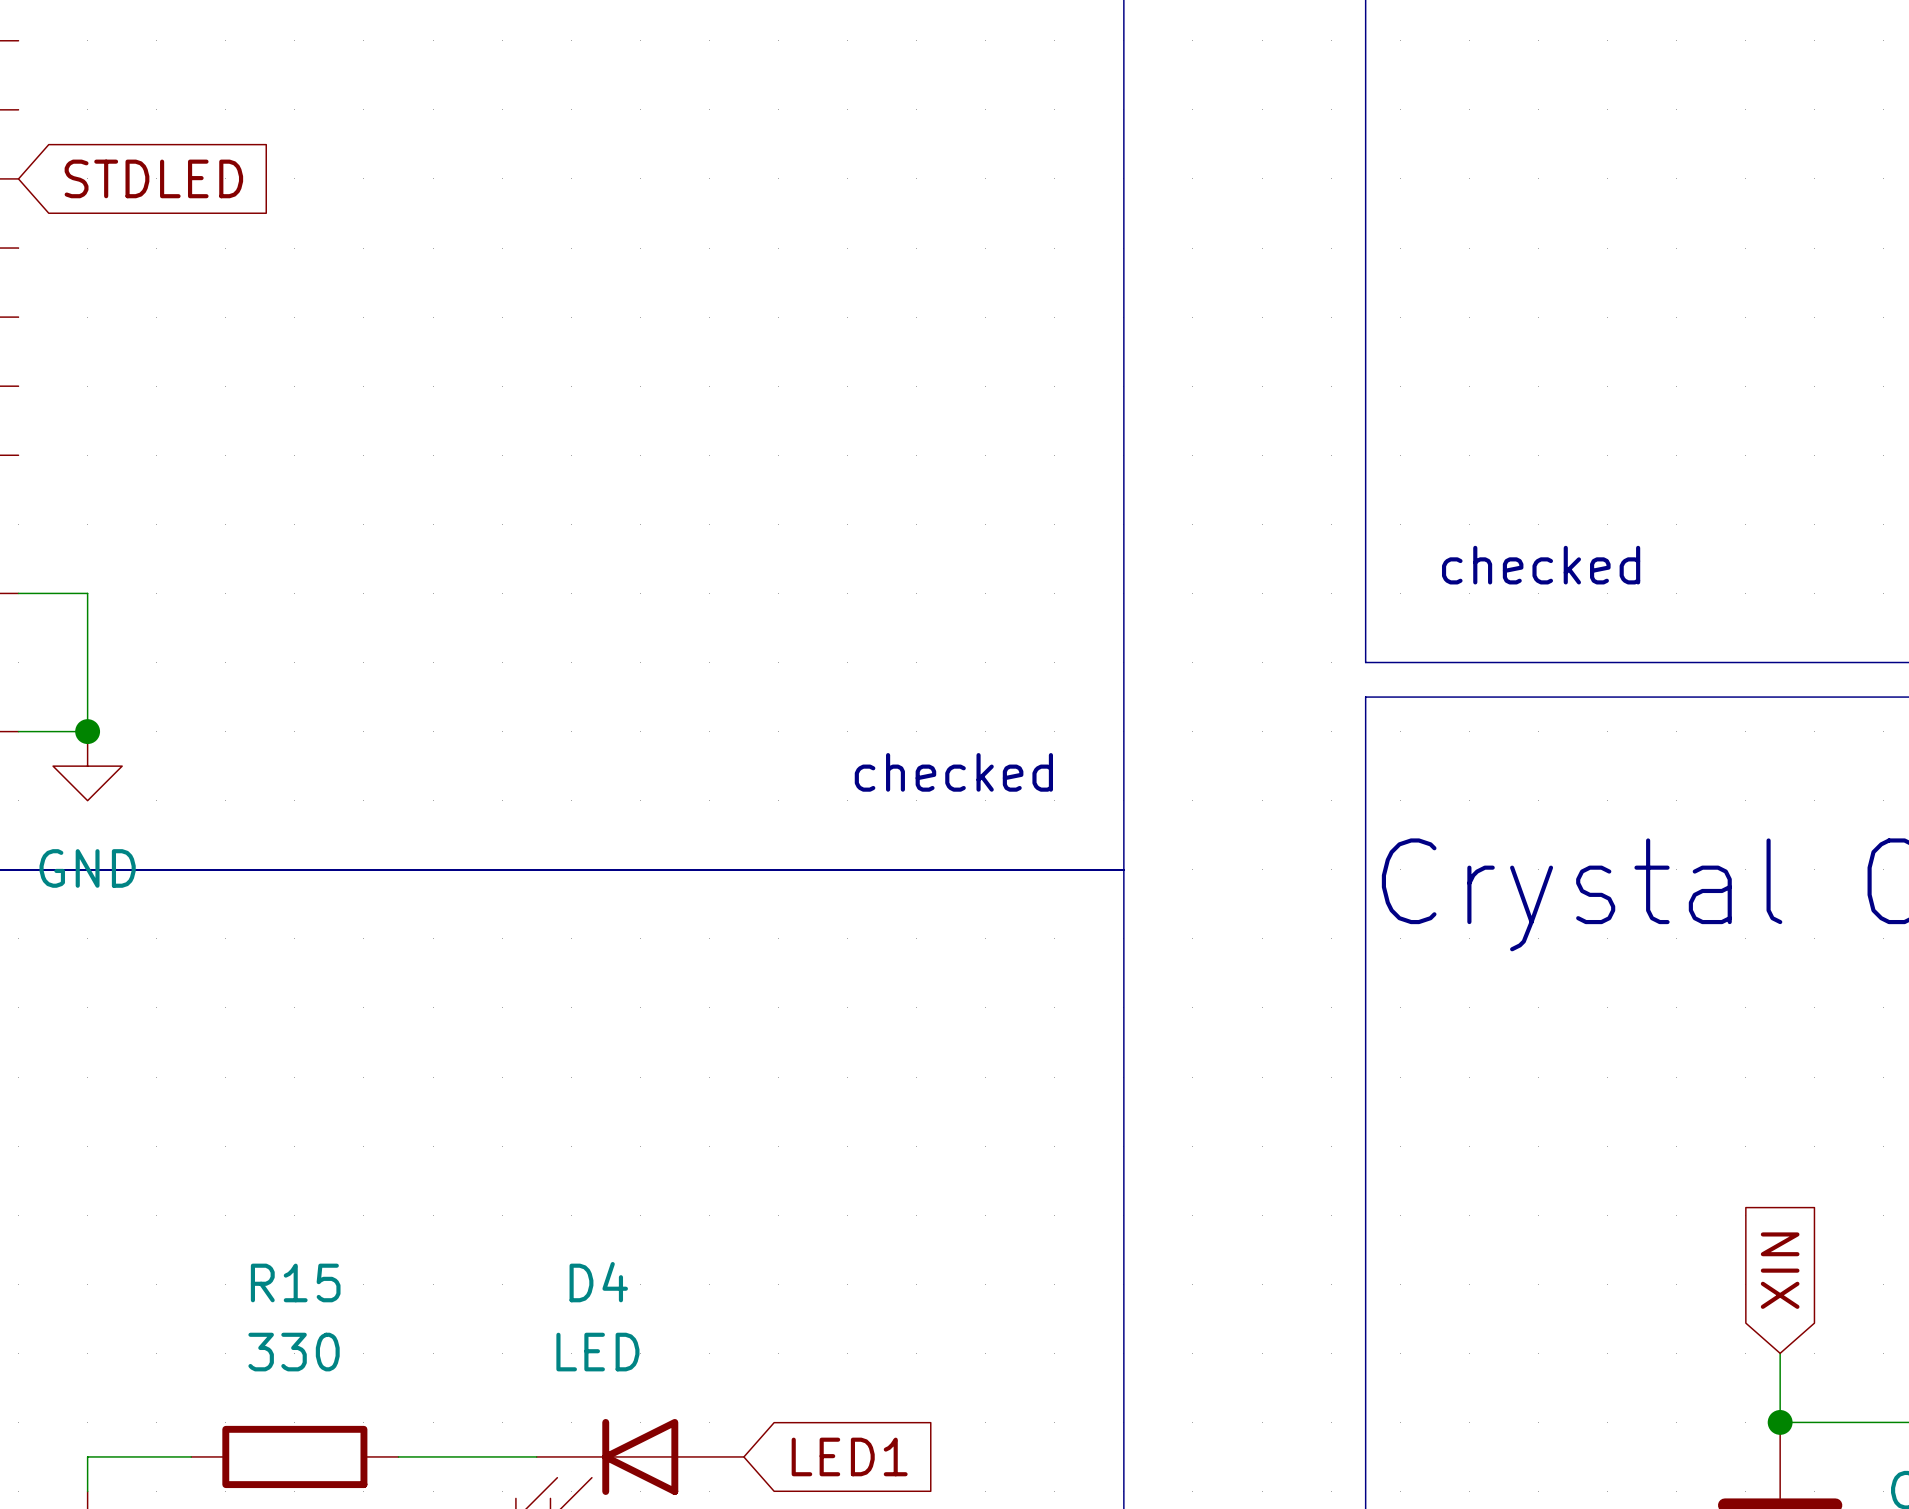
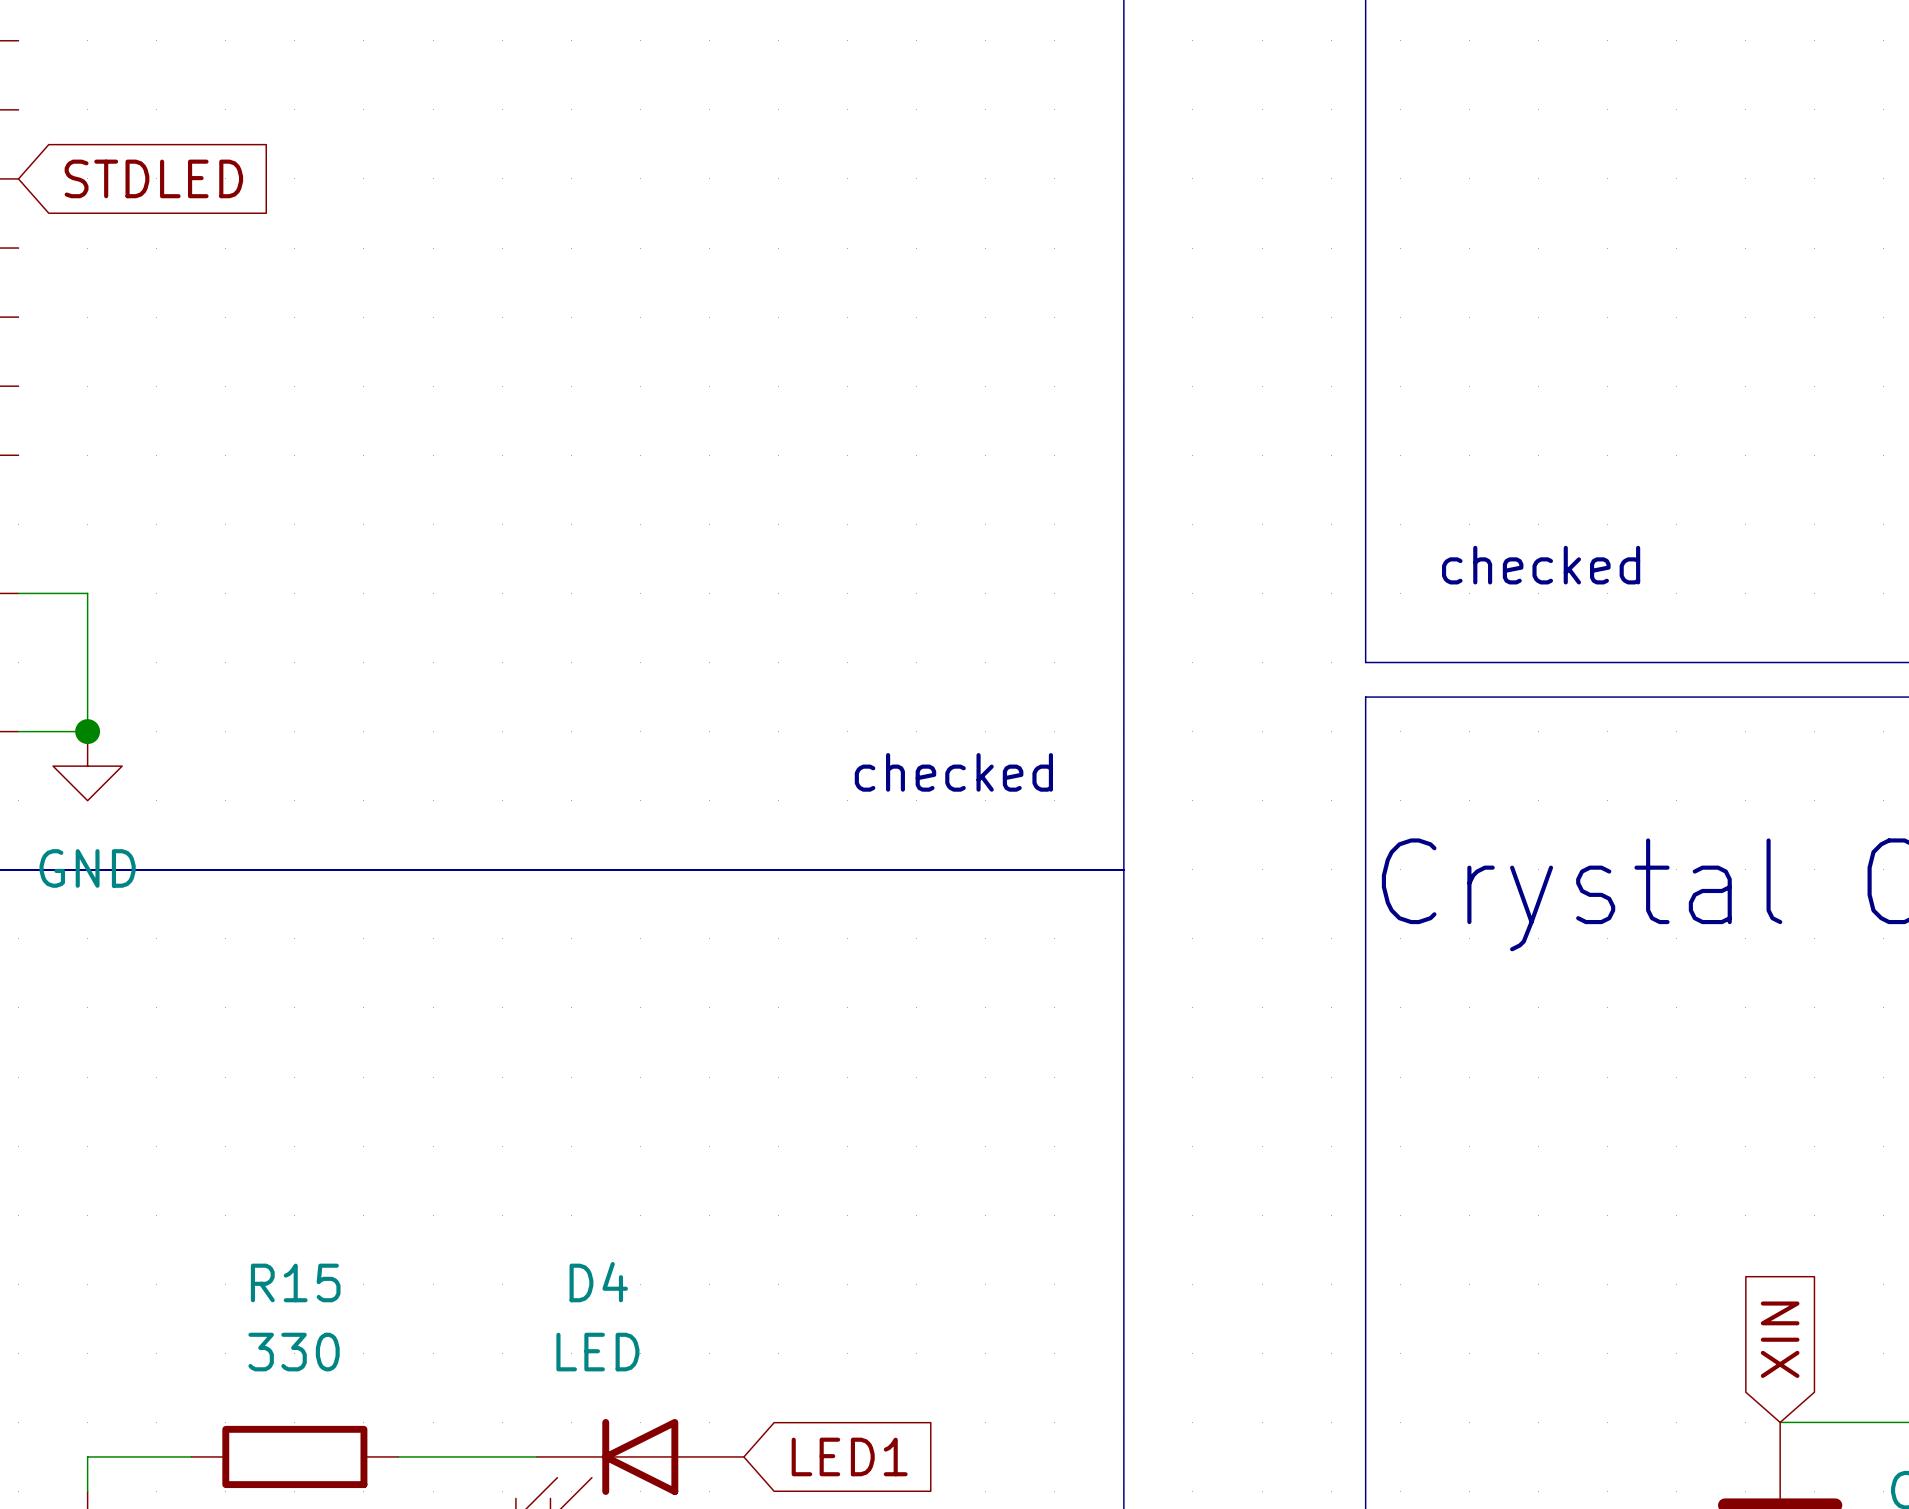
global label position: XIN (1780, 1270) -> XIN (1780, 1339)
wire: (1780, 1353) (1780, 1422) -> none
junction: (1780, 1422) -> none

